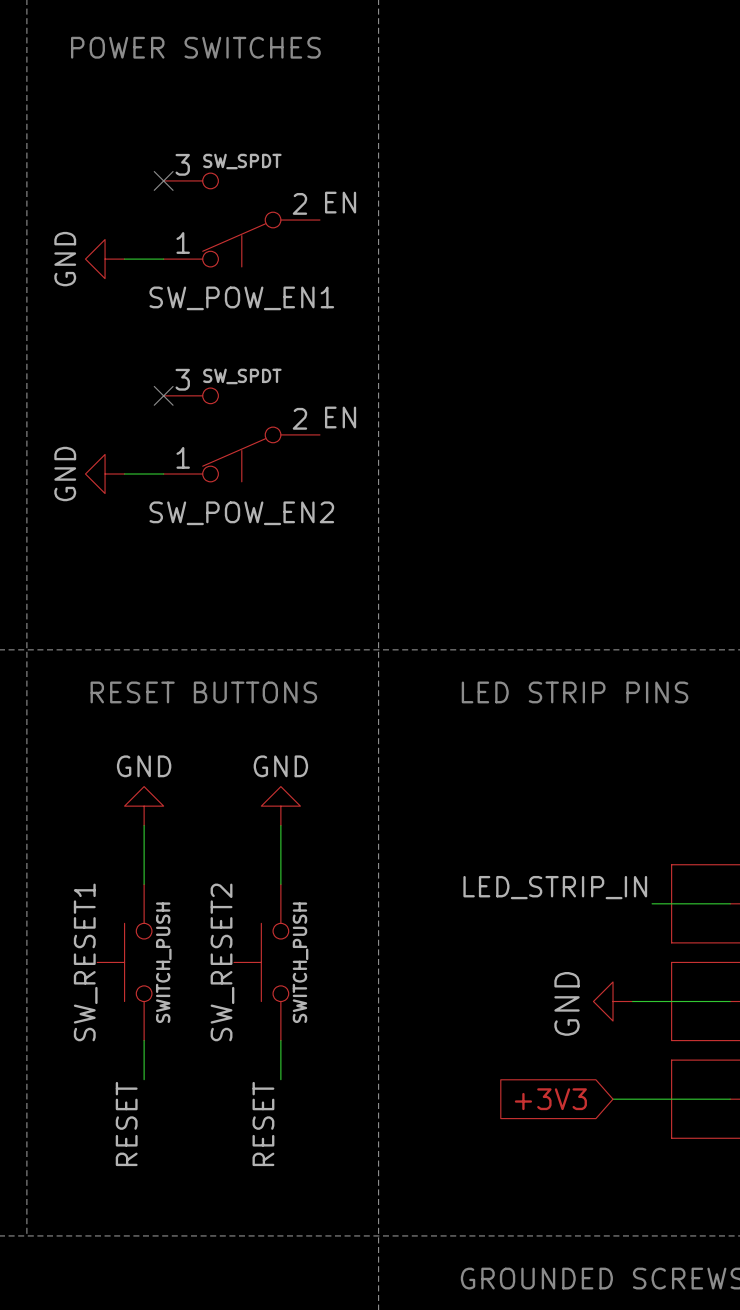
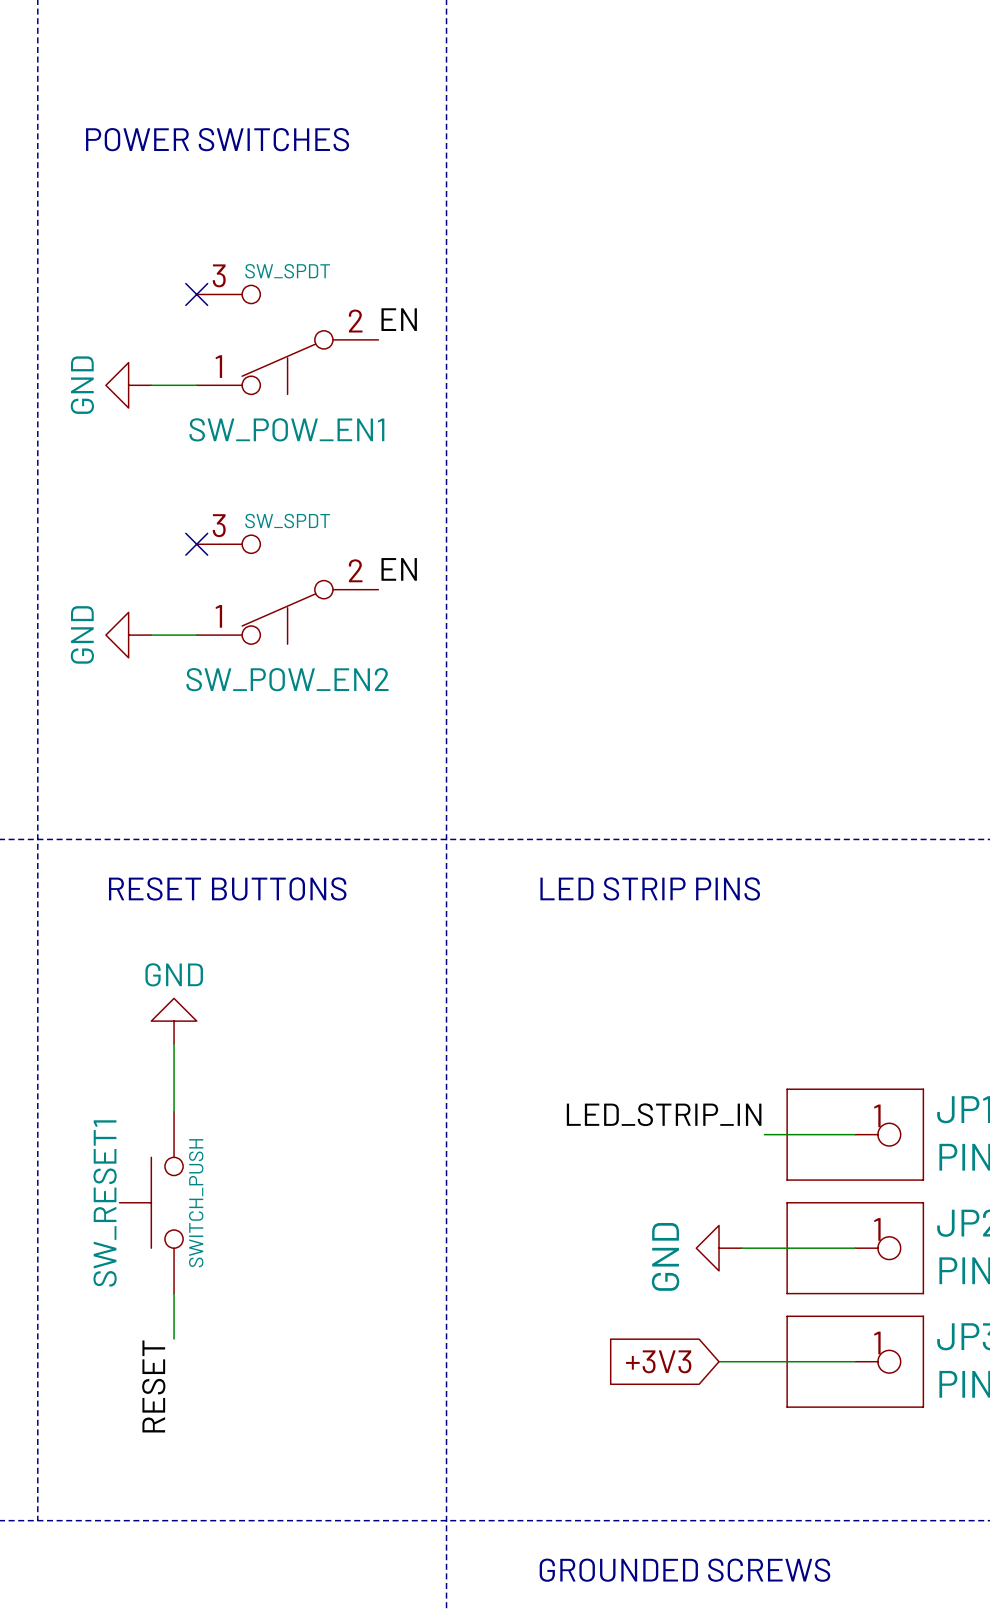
power symbol: GND (280, 806) -> none
wire: (280, 825) (280, 884) -> none
SW_RESET2: SWITCH_PUSH (261, 962) -> none
wire: (280, 1040) (280, 1079) -> none
label: RESET (263, 1123) -> none

